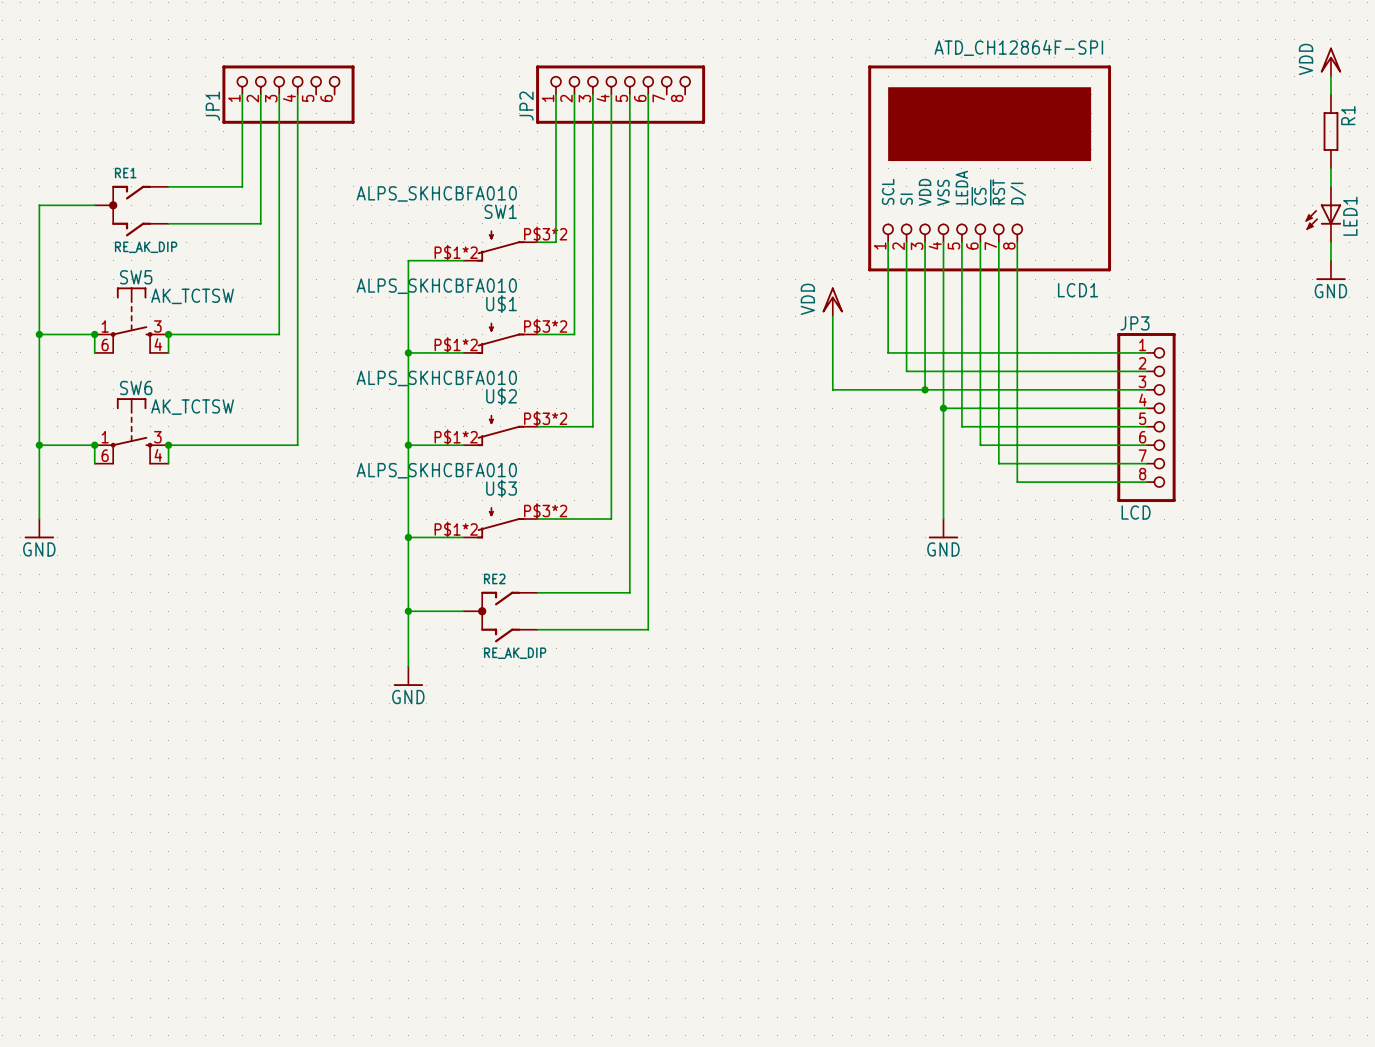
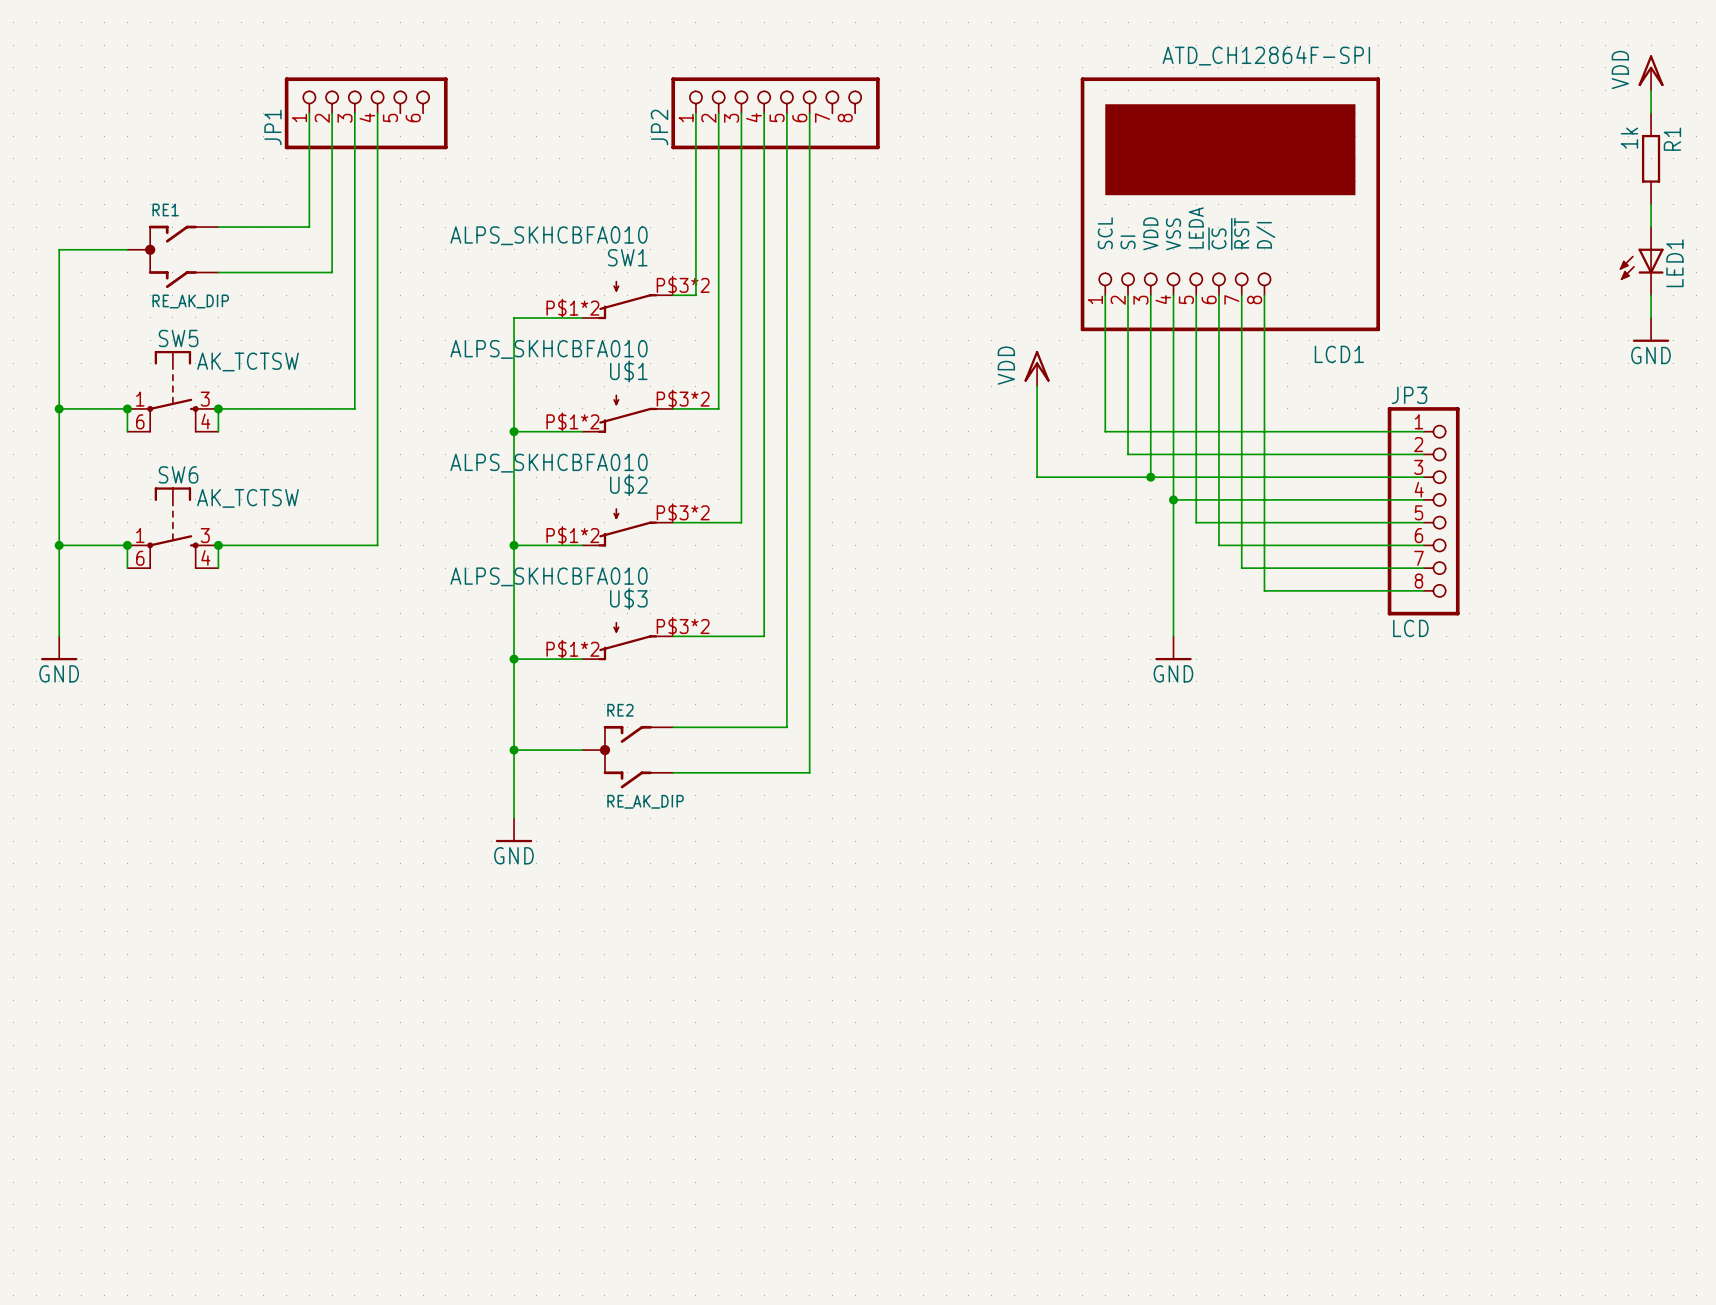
R1 value: none -> 1k (1629, 138)

